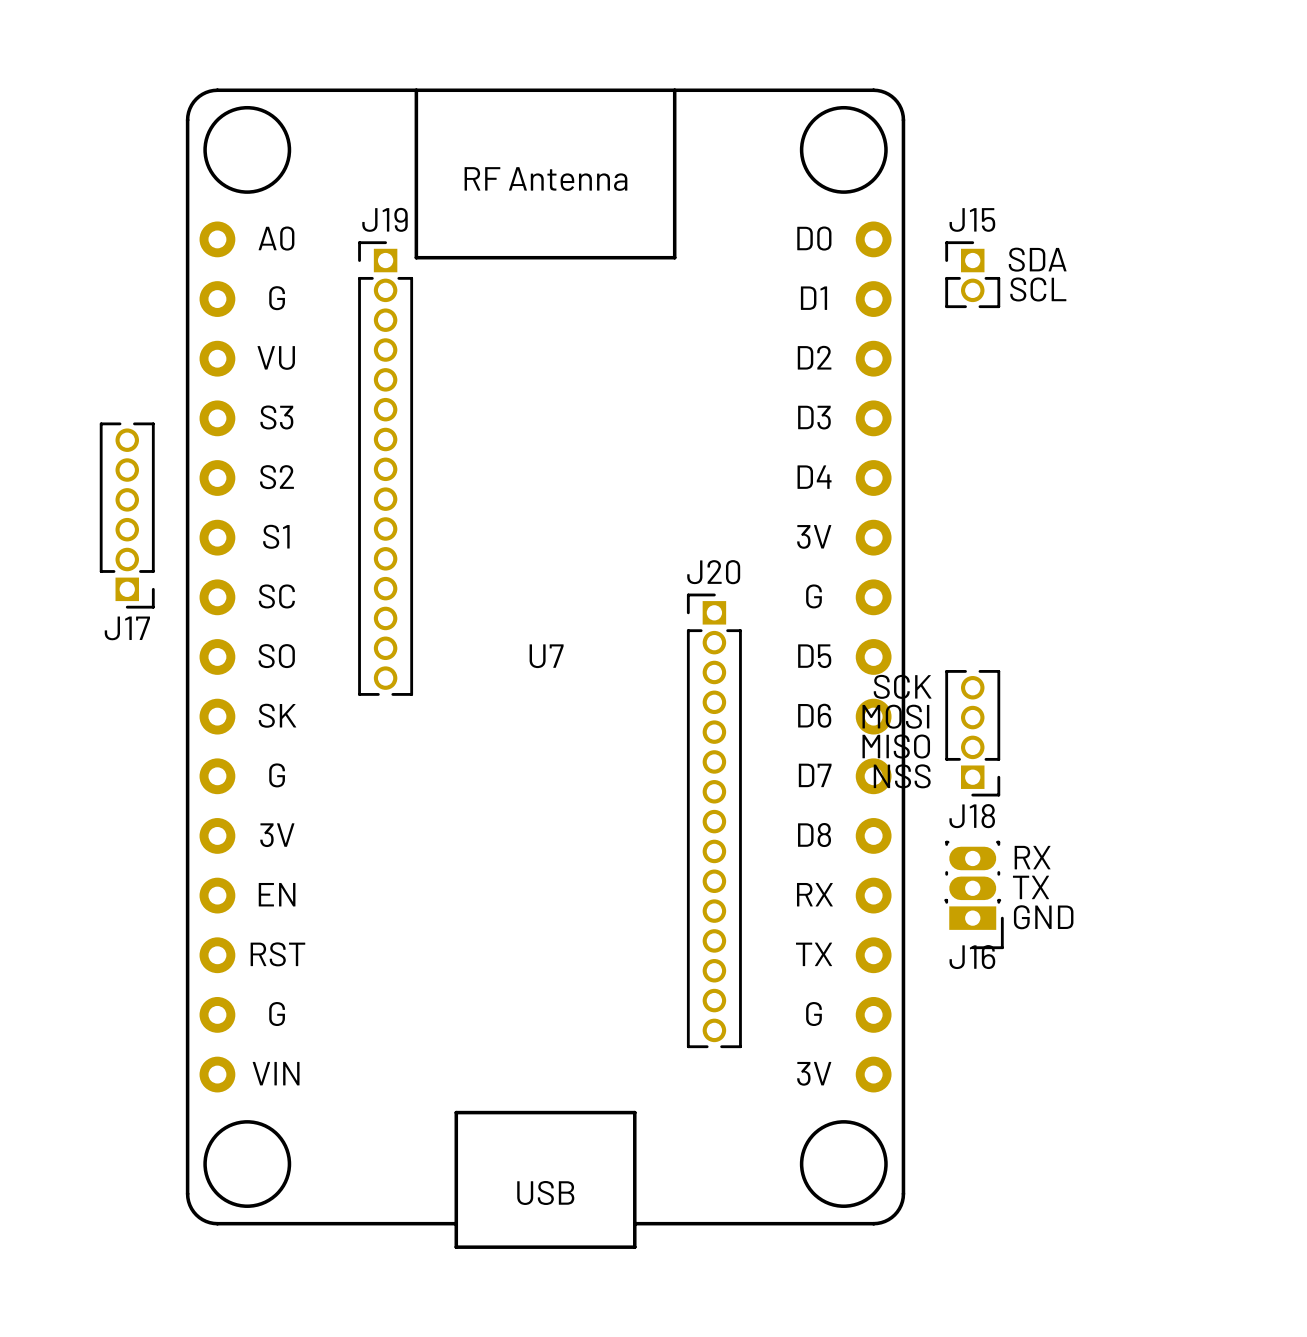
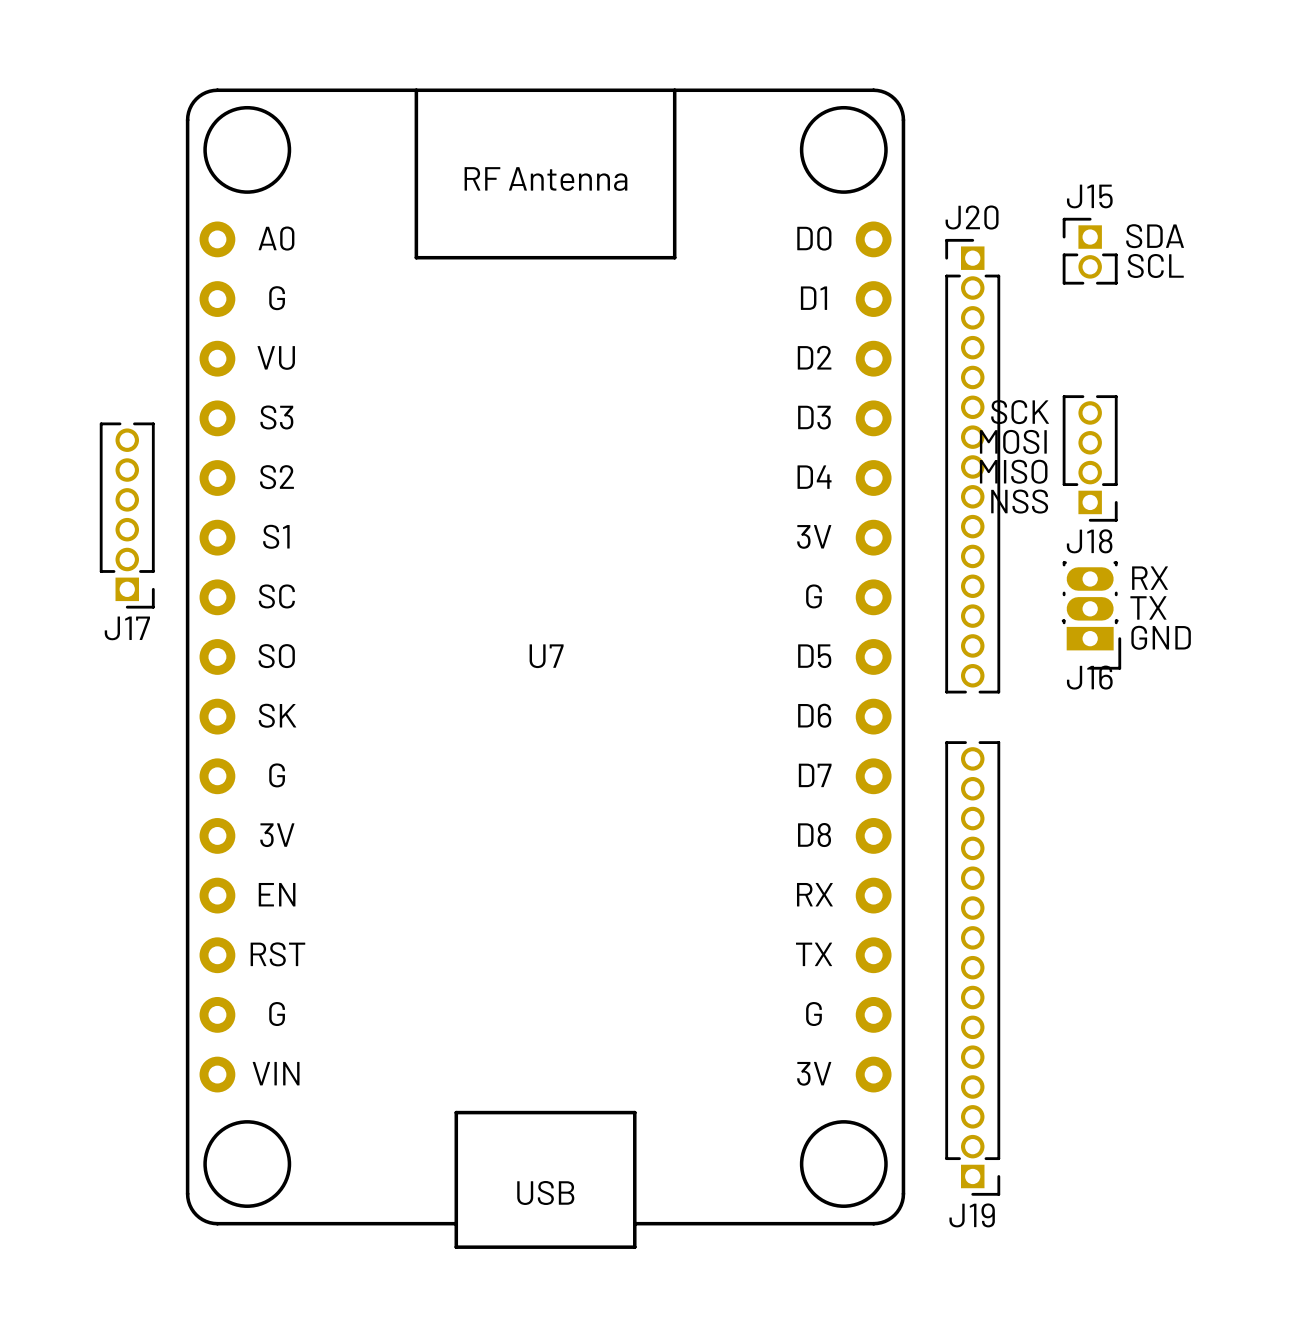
J15 position: (972, 274) -> (1090, 251)
J19 rotation: 0° (385, 468) -> 180° (972, 968)
J19 position: (385, 468) -> (972, 968)
J18 position: (972, 733) -> (1090, 458)
J20 position: (714, 820) -> (972, 466)
J16 position: (974, 894) -> (1091, 615)

